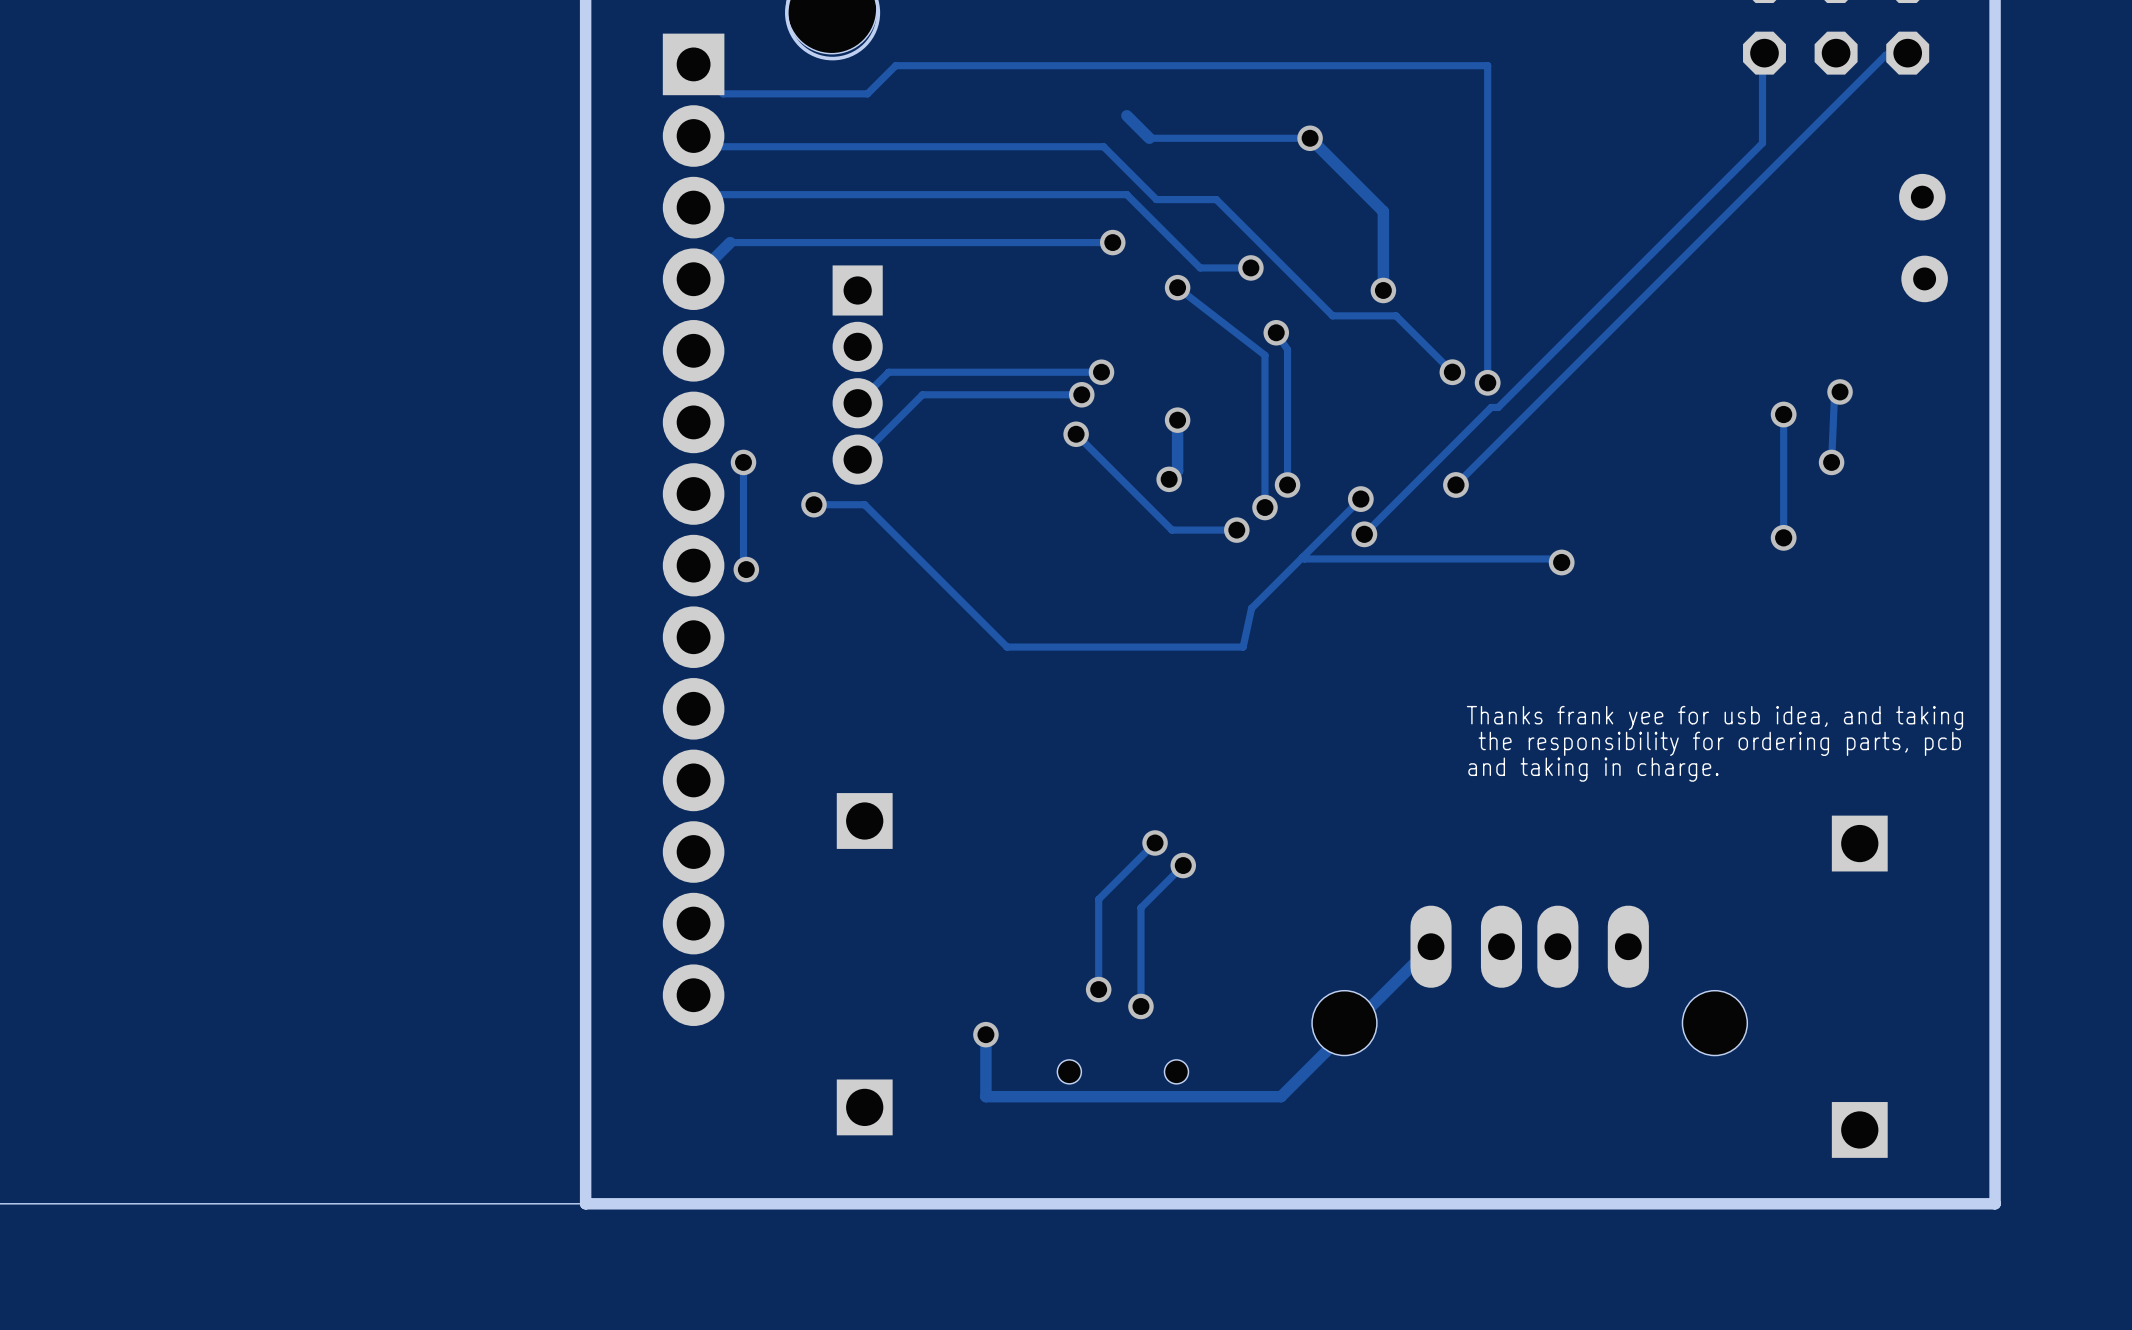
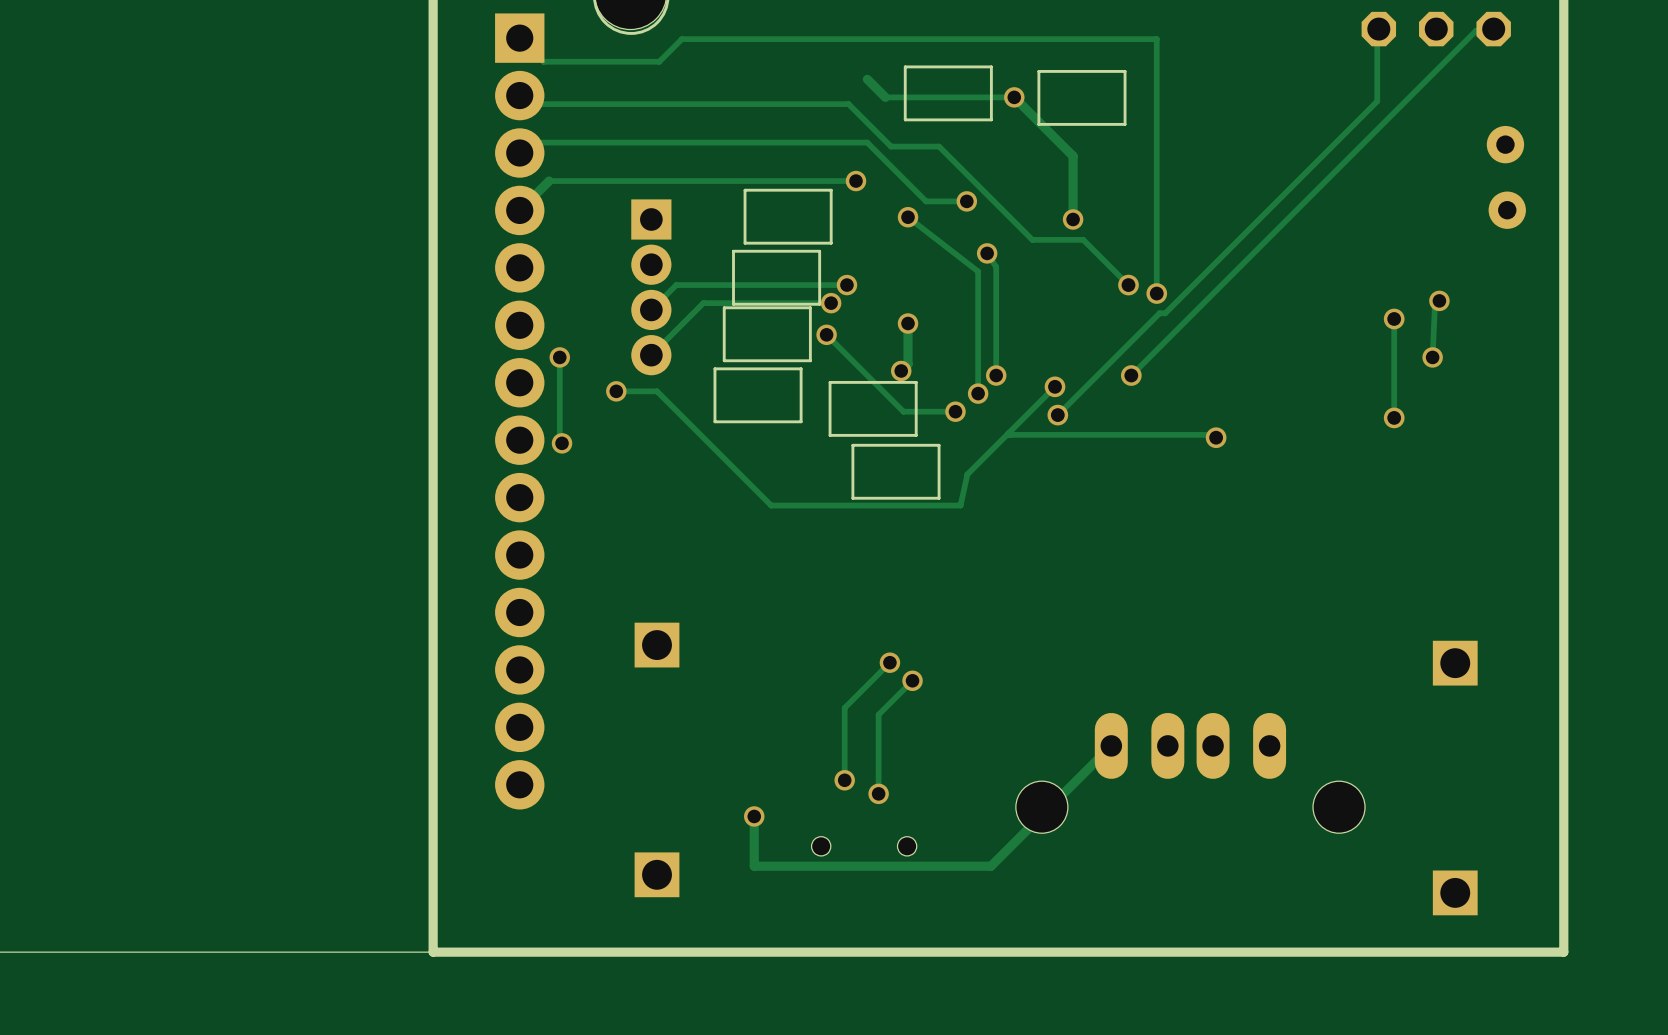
part: none -> (948, 93)
part: none -> (1081, 97)
part: none -> (788, 216)
part: none -> (776, 277)
part: none -> (767, 334)
part: none -> (758, 395)
part: none -> (873, 408)
part: none -> (895, 471)
text: Thanks frank yee for usb idea, and taking (1714, 718) -> none
text: the responsibility for ordering parts, pcb (1719, 743) -> none
text: and taking in charge. (1593, 769) -> none

